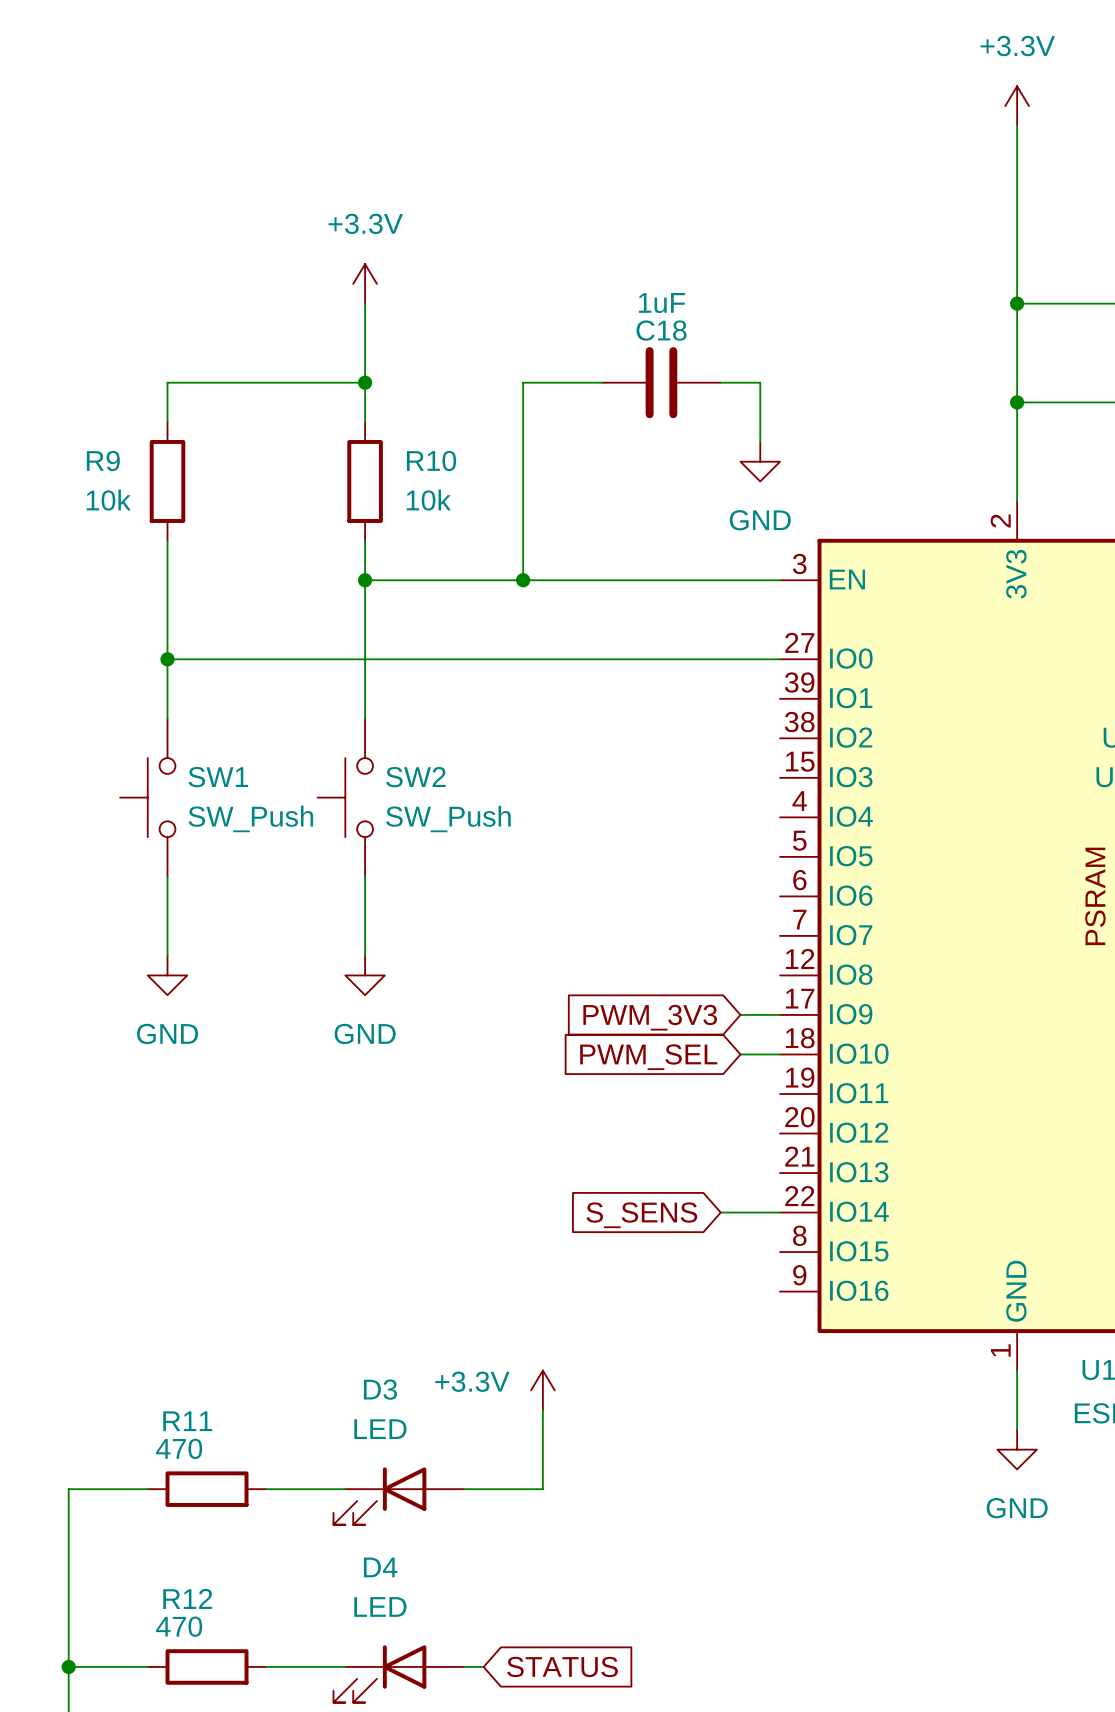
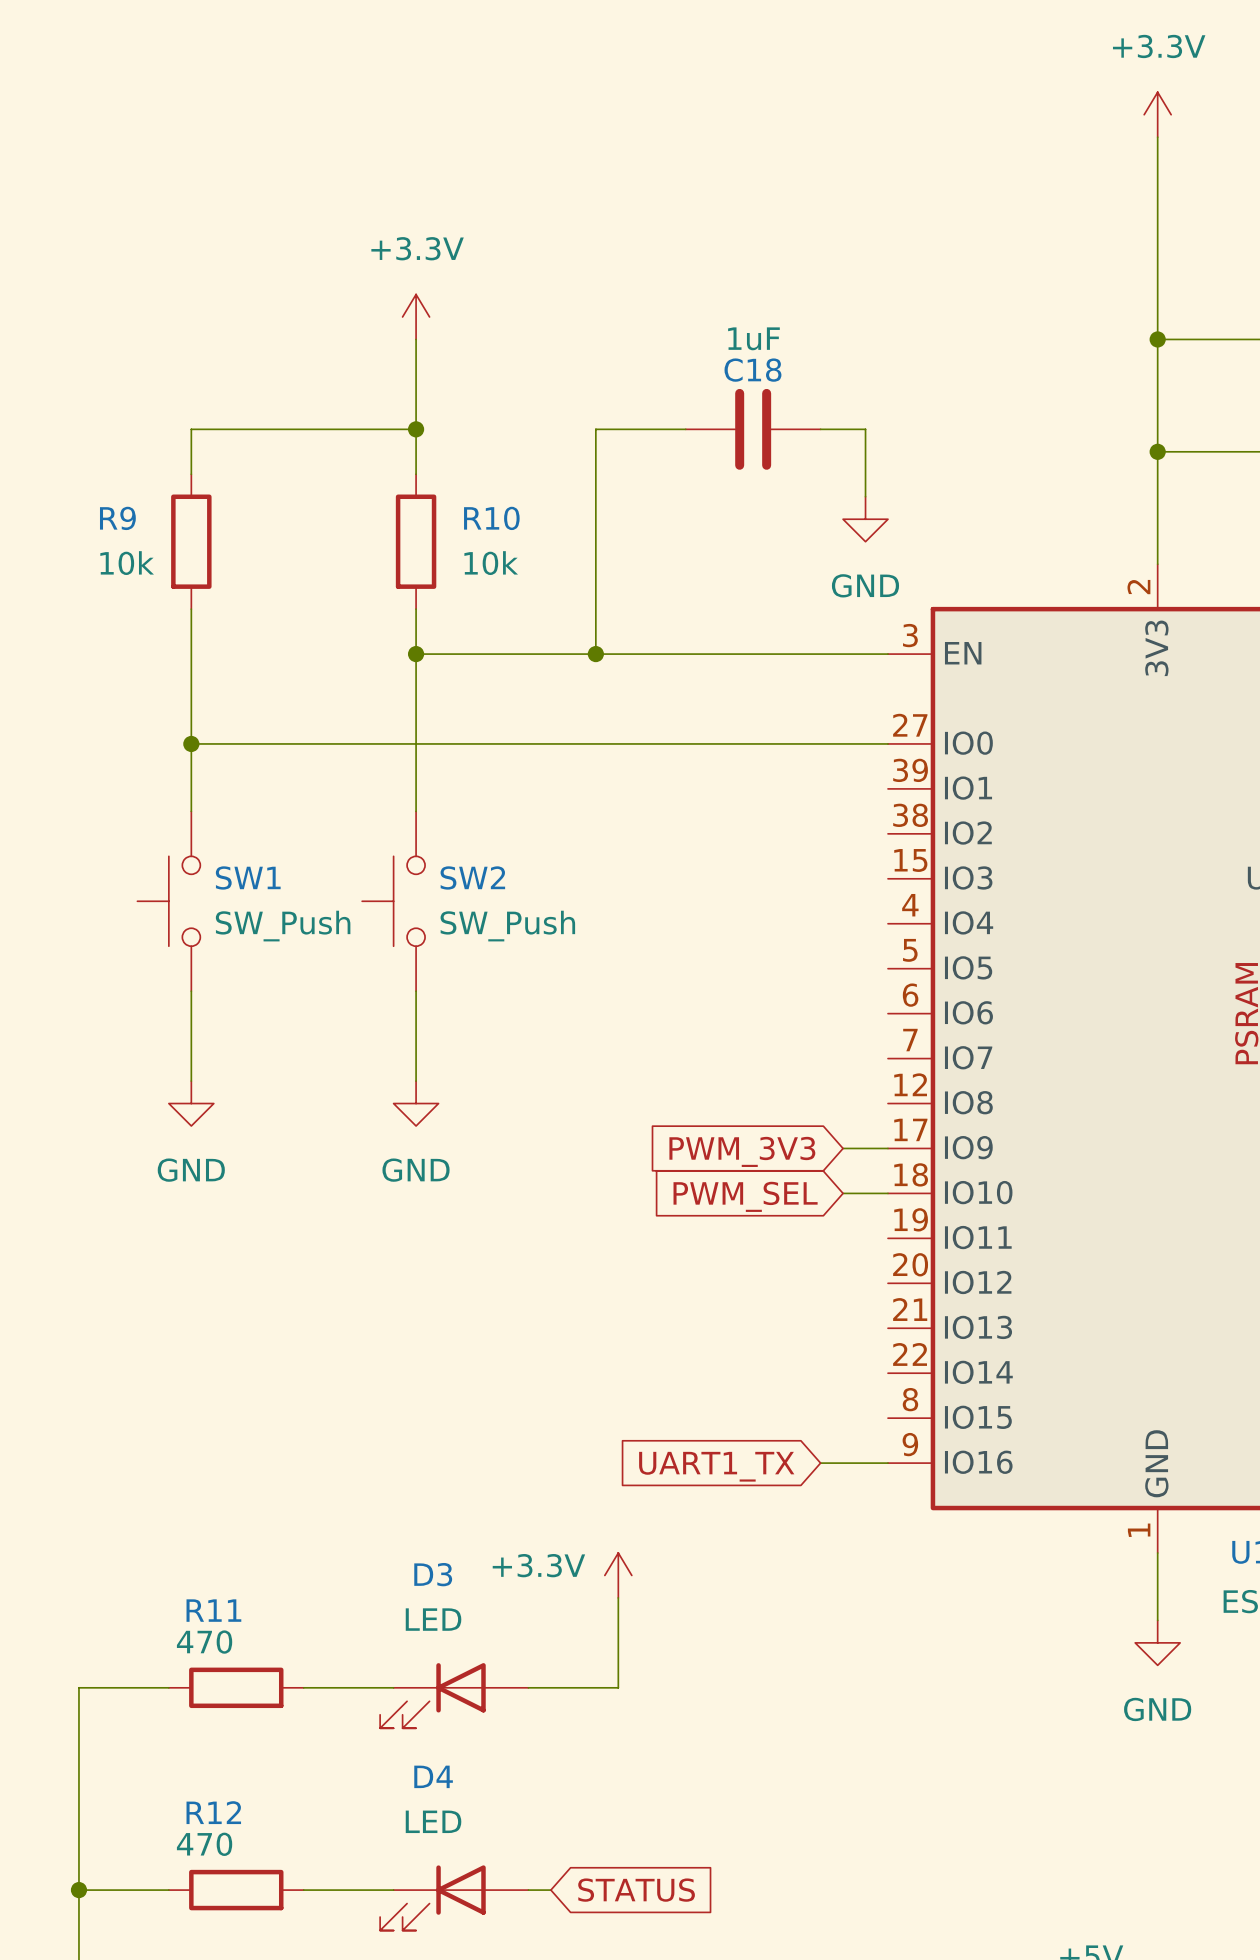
wire: (720, 1212) (780, 1212) -> (820, 1463) (888, 1463)
global label: S_SENS (641, 1215) -> none
global label: none -> UART1_TX (716, 1466)

